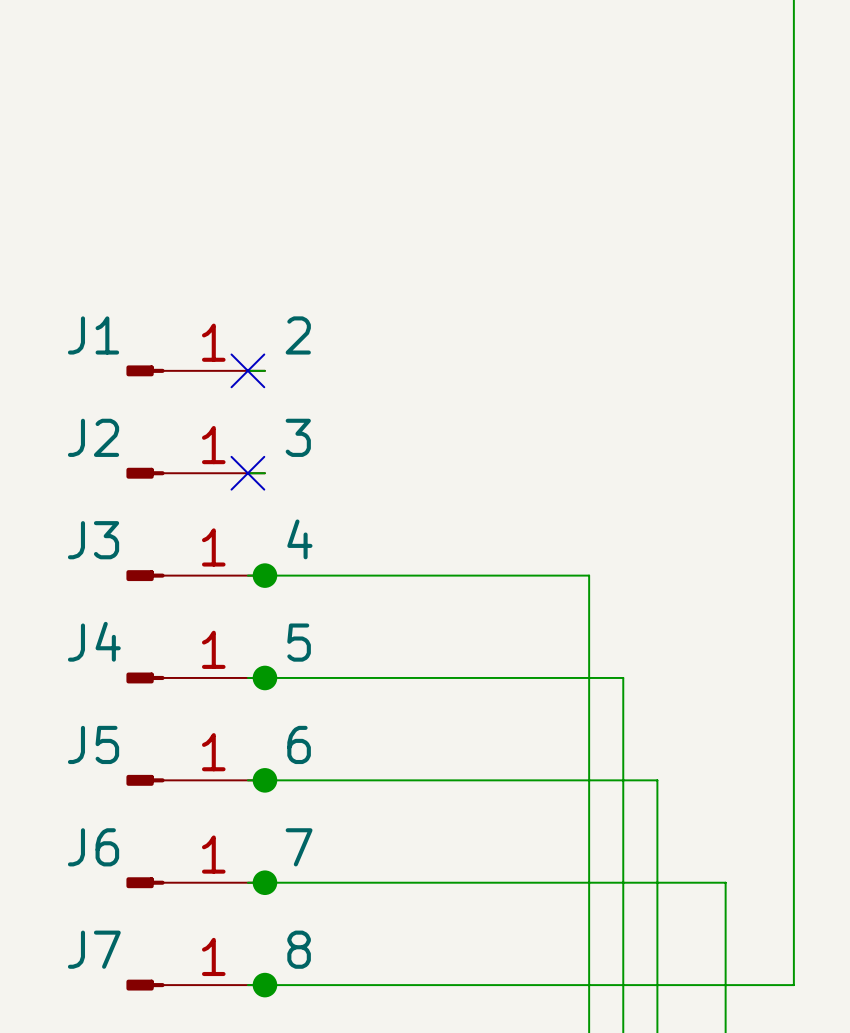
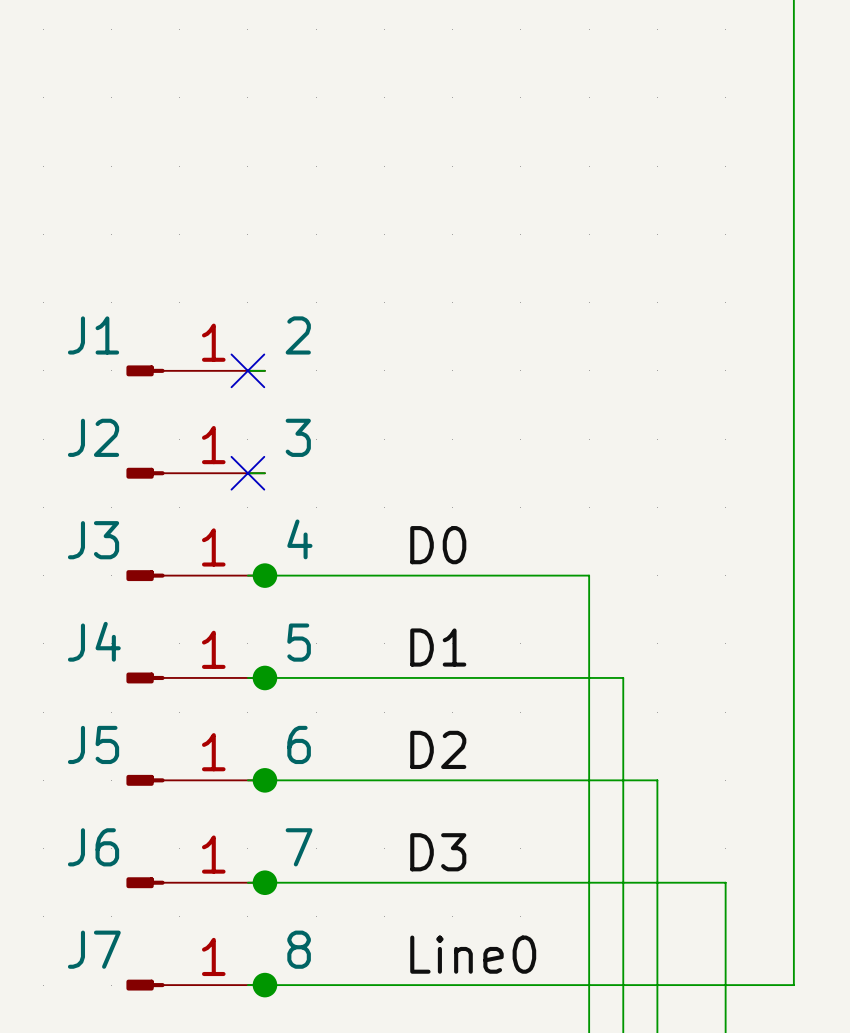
label: none -> D0 (438, 545)
label: none -> D1 (438, 647)
label: none -> D2 (438, 749)
label: none -> D3 (438, 852)
label: none -> Line0 (473, 954)

